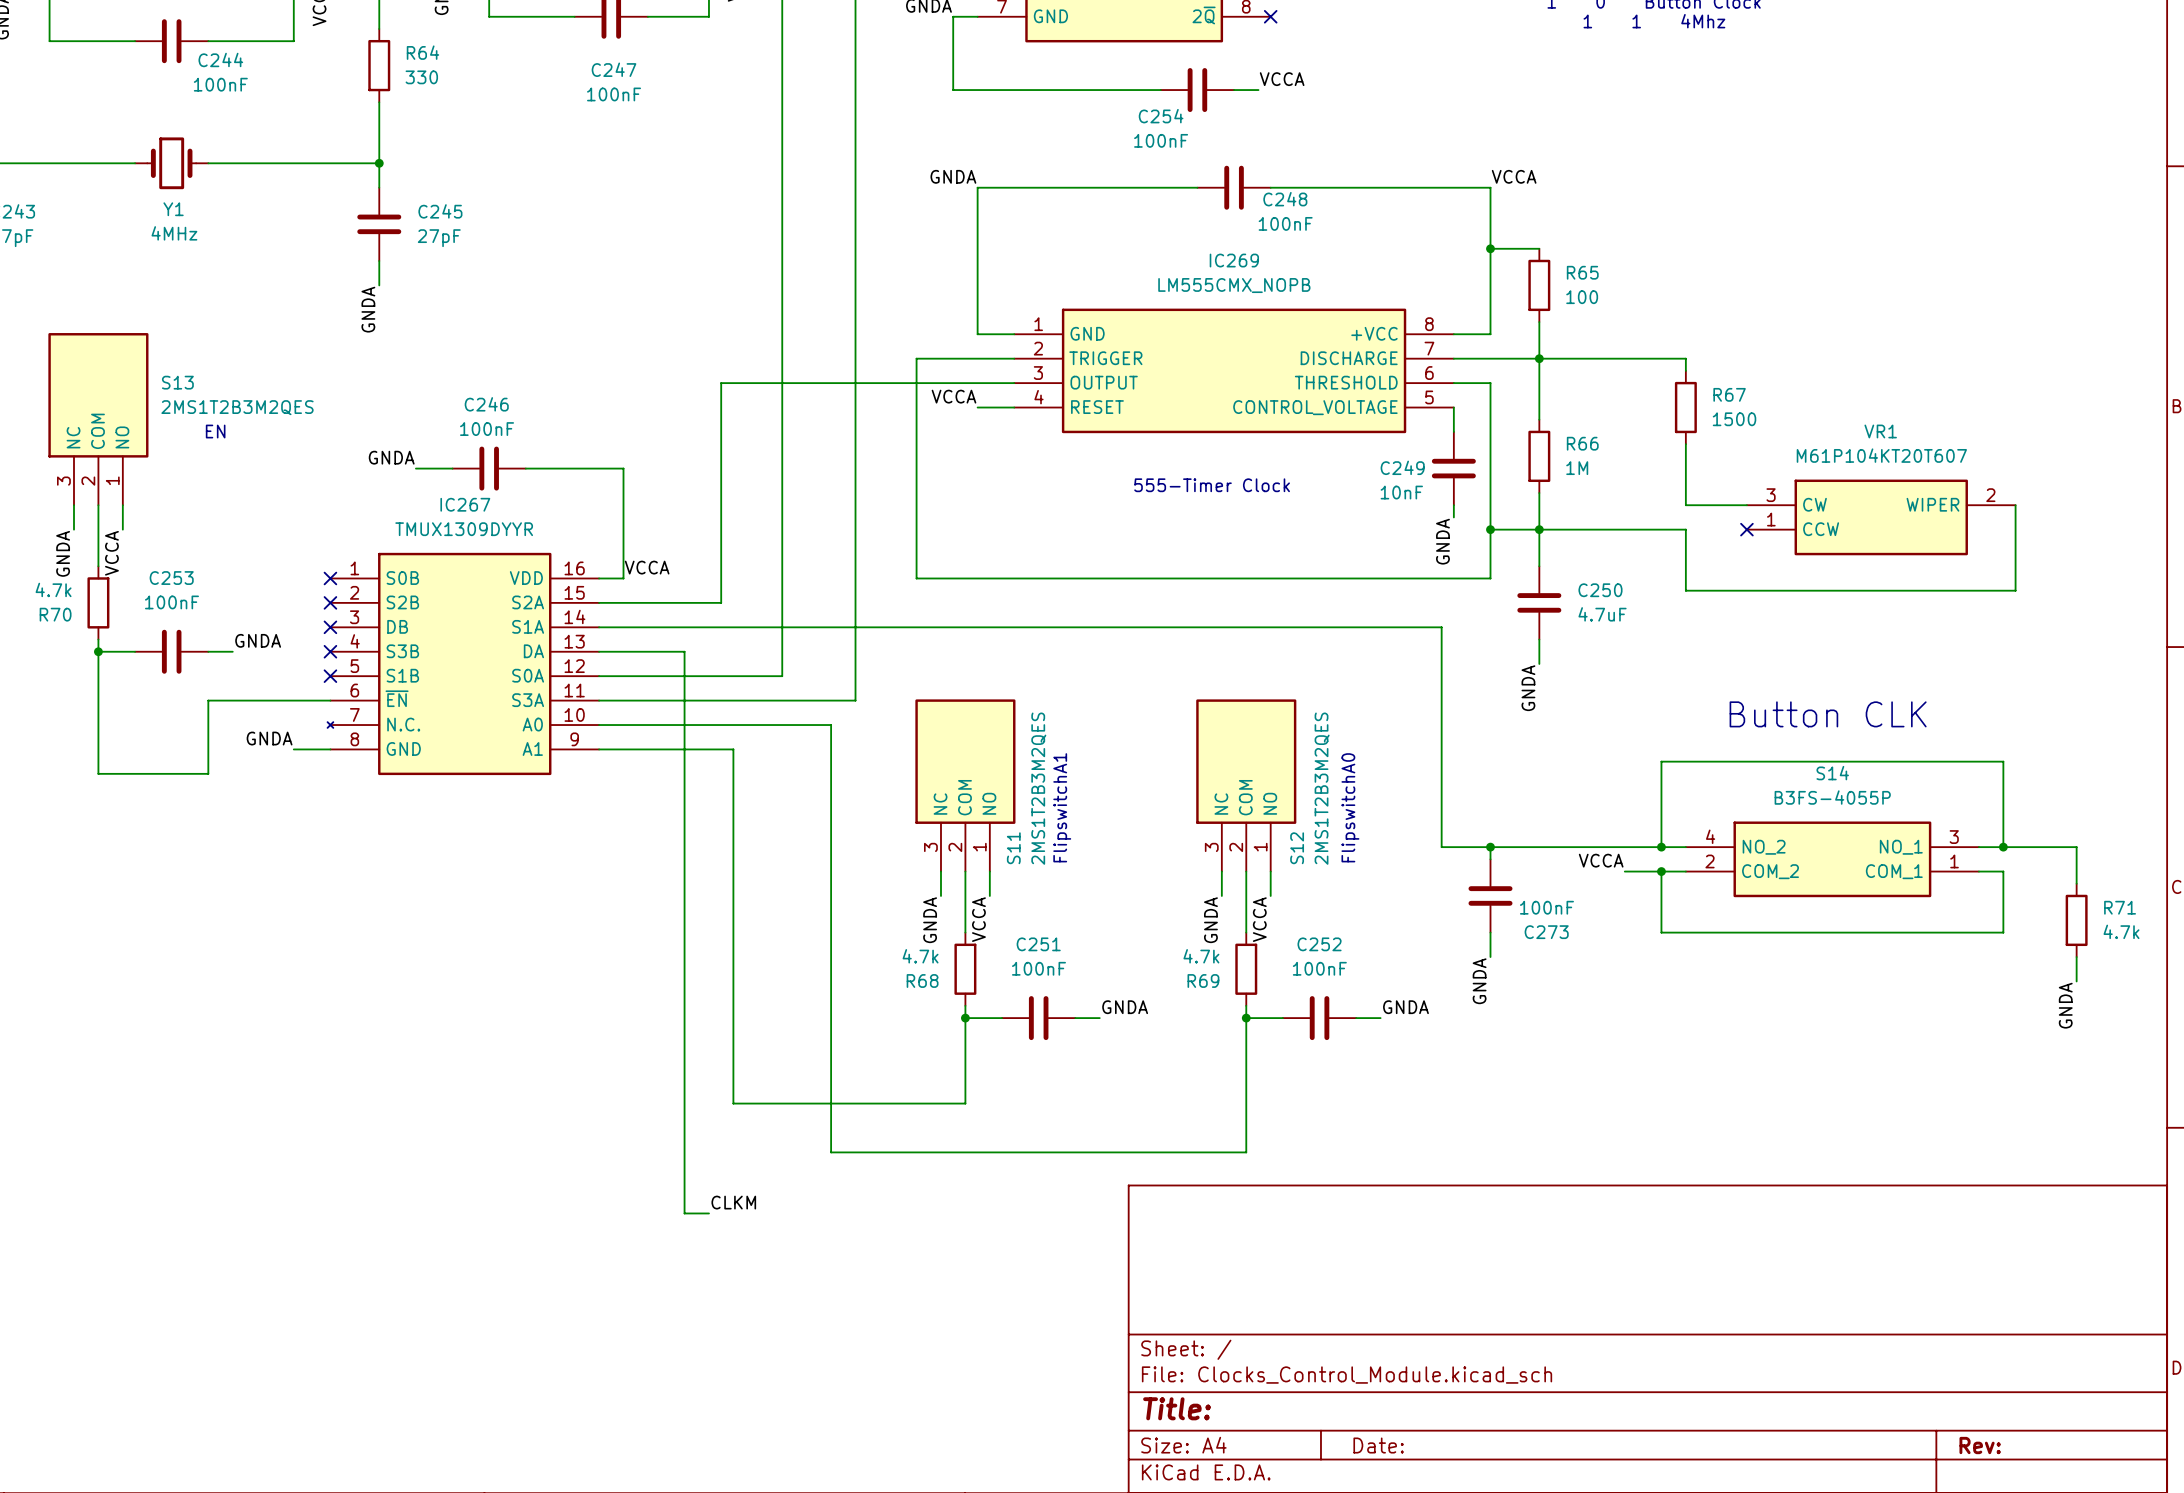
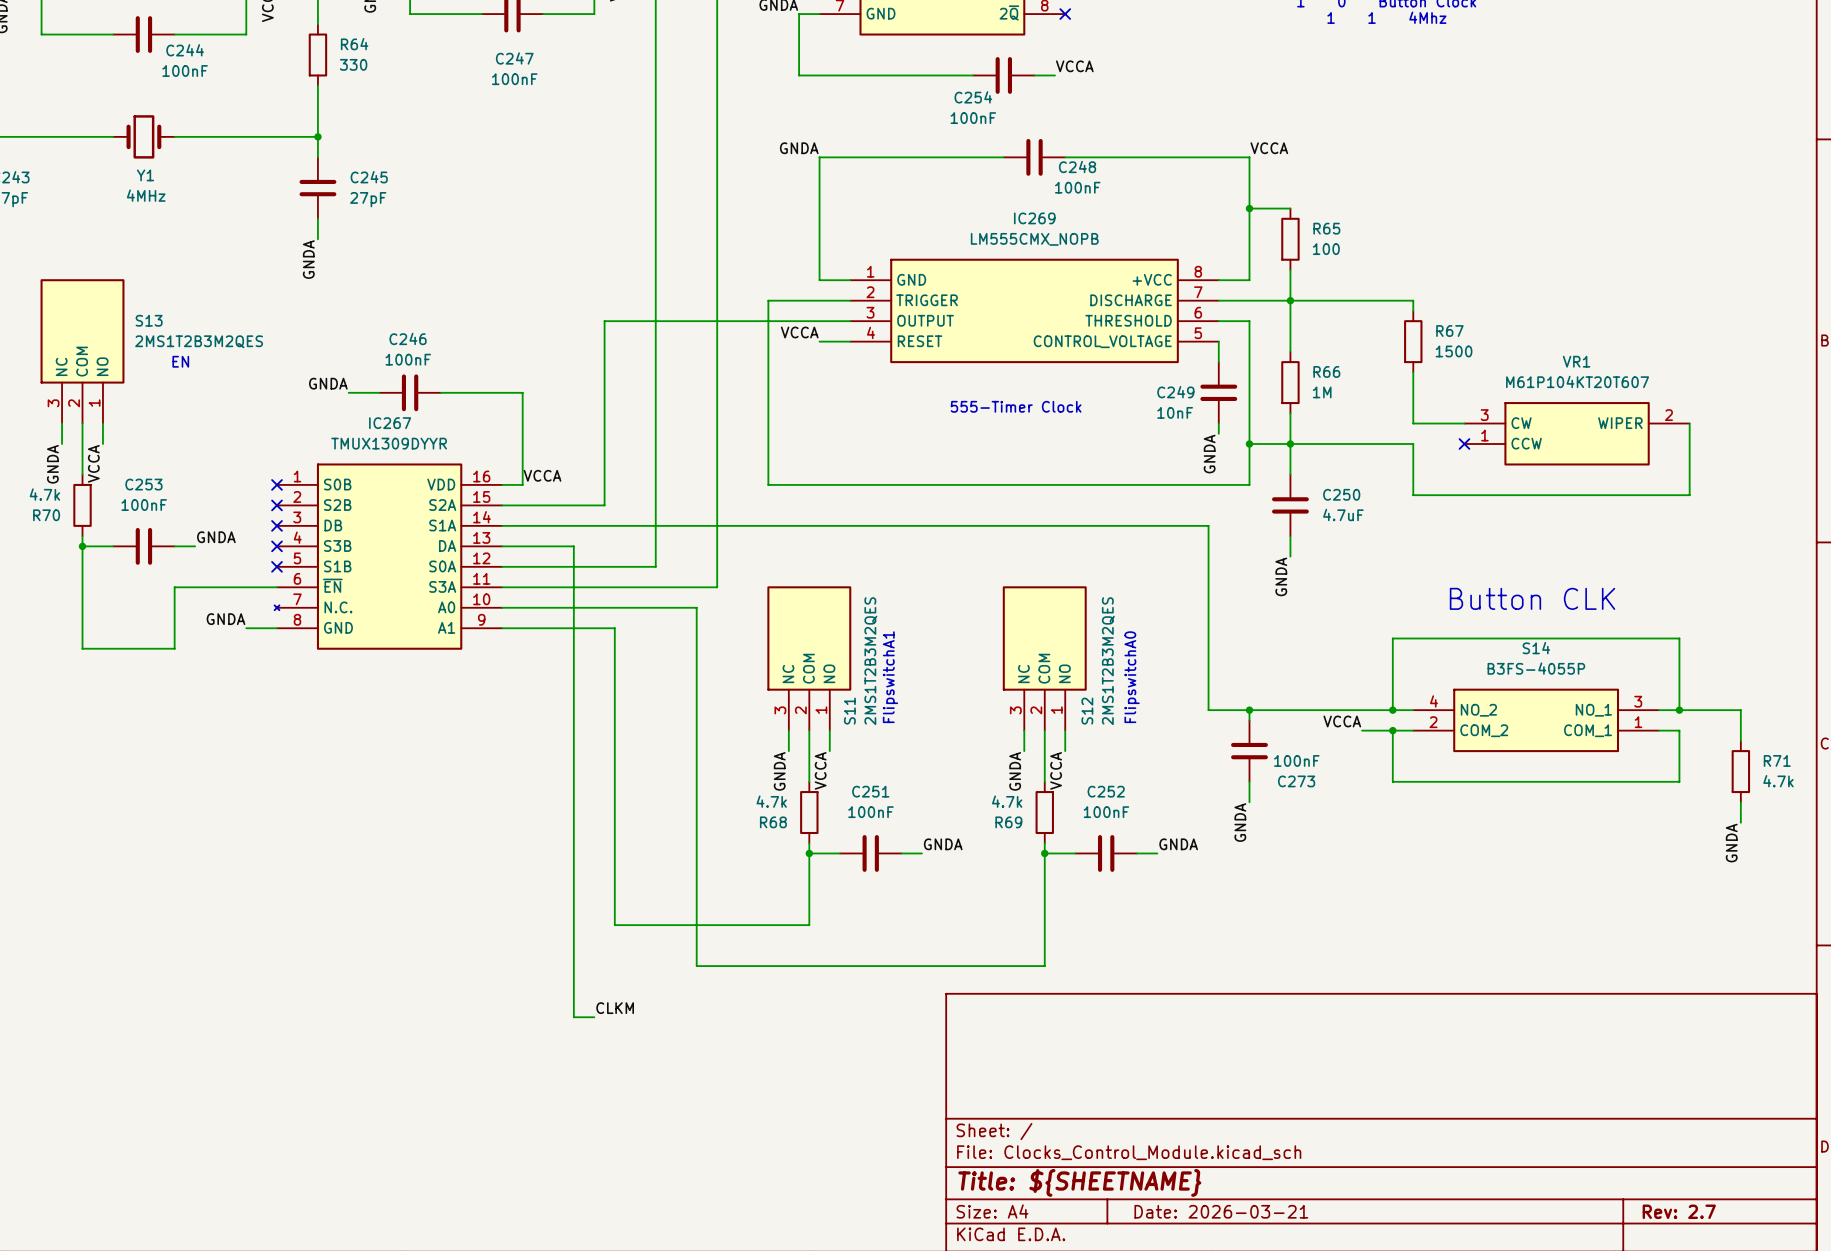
title block: Title: (1177, 1408) -> Title: ${SHEETNAME} (1079, 1182)
title block: Date: (1378, 1445) -> Date: 2026-03-21 (1221, 1211)
title block: Rev: (1980, 1445) -> Rev: 2.7 (1679, 1211)

